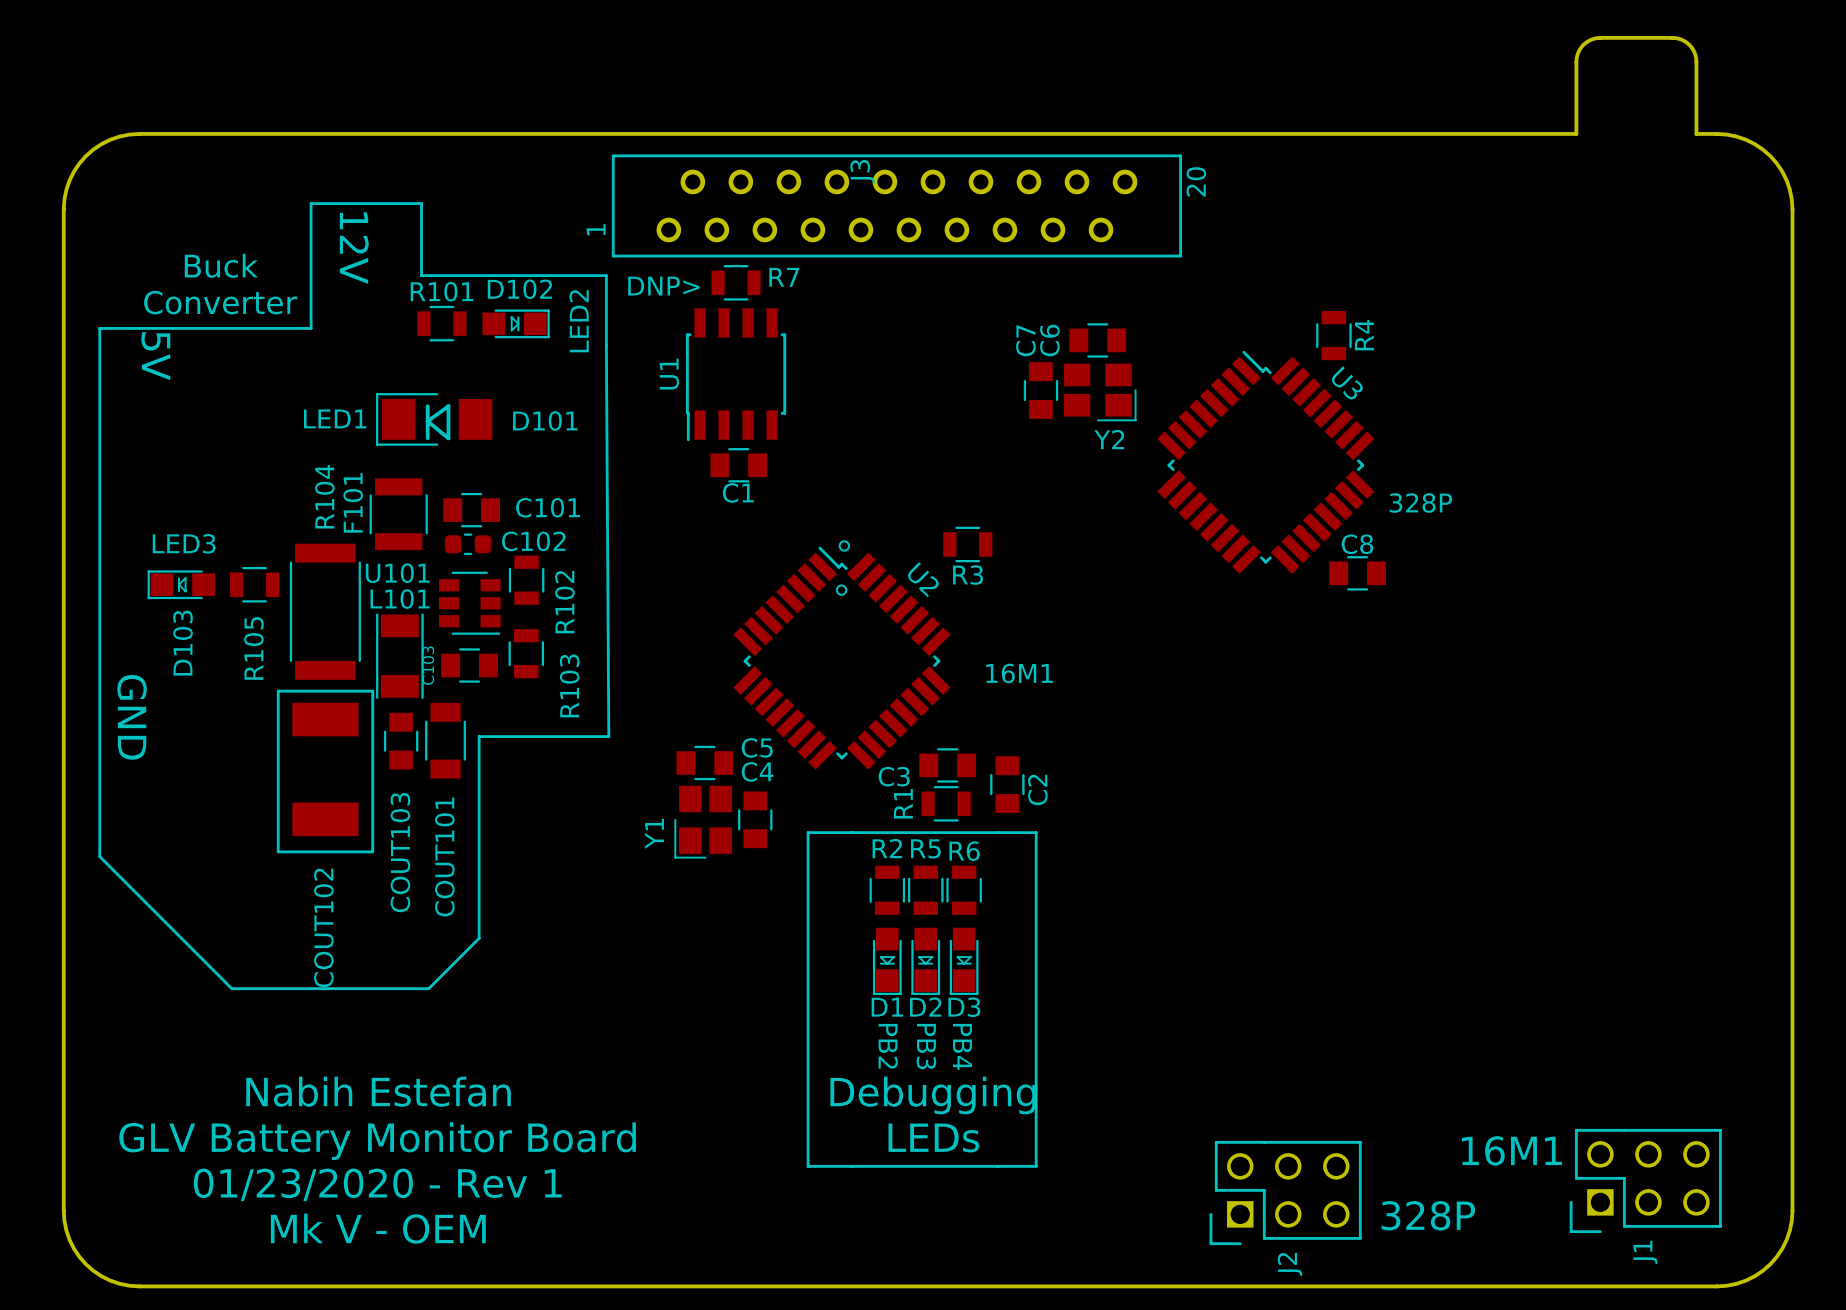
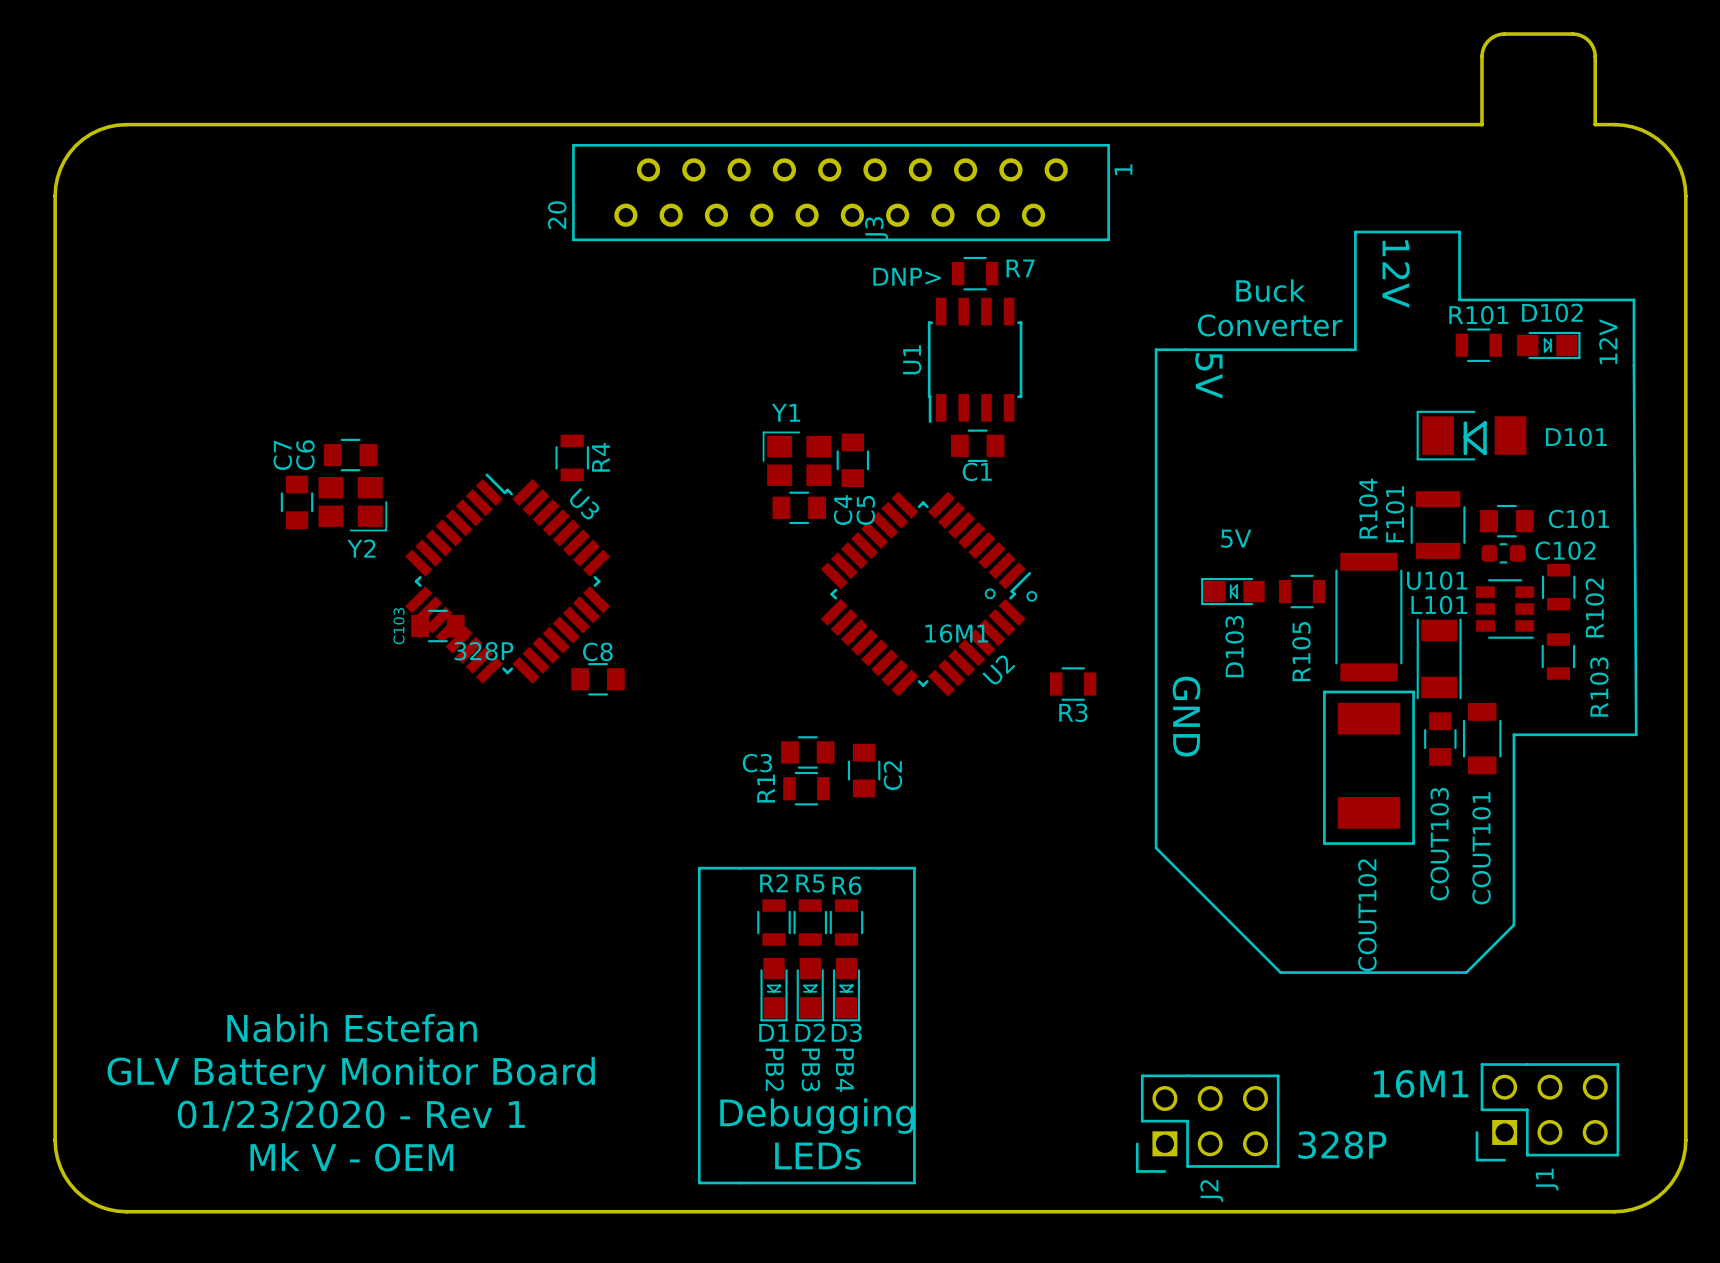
line: (311, 203) (421, 203) (421, 275) (606, 275) (608, 736) (479, 736) (479, 938) (428, 988) (231, 988) (99, 856) (99, 328) (311, 328) (311, 203) -> none
J3 rotation: 0° (896, 205) -> 180° (841, 192)
line: none -> (1355, 231) (1459, 231) (1459, 299) (1633, 299) (1636, 734) (1513, 734) (1513, 925) (1466, 972) (1280, 972) (1156, 848) (1156, 349) (1355, 349) (1355, 231)
text: 12V (354, 248) -> none
text: Buck (221, 265) -> none
R7 position: (736, 282) -> (975, 273)
text position: DNP> (663, 286) -> DNP> (907, 276)
text: none -> 12V (1396, 274)
text: Converter (220, 302) -> none
text: none -> Buck (1270, 290)
text: LED2 (579, 321) -> none
R101 position: (441, 323) -> (1478, 345)
D102 position: (516, 323) -> (1548, 345)
R4 position: (1333, 335) -> (572, 457)
C6 position: (1097, 340) -> (350, 455)
text: none -> Converter (1270, 325)
text: 5V (155, 356) -> none
text: none -> 12V (1608, 341)
U1 position: (736, 374) -> (975, 360)
C7 position: (1040, 390) -> (297, 502)
Y2 position: (1100, 392) -> (352, 504)
text: none -> 5V (1208, 375)
text: LED1 (335, 418) -> none
D101 position: (434, 419) -> (1471, 435)
U3 position: (1265, 462) -> (507, 578)
C1 position: (738, 465) -> (977, 445)
text: 328P (1420, 502) -> none
C101 position: (471, 510) -> (1506, 521)
F101 position: (398, 514) -> (1438, 525)
text: LED3 (184, 543) -> none
C102 position: (468, 544) -> (1503, 553)
R3 position: (967, 544) -> (1073, 684)
text: none -> 5V (1236, 538)
C8 position: (1357, 573) -> (598, 679)
R102 position: (526, 580) -> (1558, 587)
D103 position: (181, 584) -> (1232, 591)
R105 position: (254, 584) -> (1302, 591)
U101 position: (469, 603) -> (1505, 608)
R104 position: (325, 611) -> (1368, 617)
R103 position: (526, 653) -> (1558, 656)
U2 rotation: 0° (841, 655) -> 90° clockwise (928, 594)
U2 position: (841, 655) -> (928, 594)
L101 position: (399, 656) -> (1439, 658)
text: none -> 328P (483, 651)
text: GND (132, 717) -> none
COUT101 position: (445, 740) -> (1482, 738)
COUT103 position: (401, 741) -> (1440, 739)
text: none -> GND (1186, 716)
C5 rotation: 0° (704, 762) -> 90° clockwise (852, 460)
C5 position: (704, 762) -> (852, 460)
C3 position: (947, 765) -> (807, 752)
COUT102 position: (325, 771) -> (1368, 767)
C2 position: (1007, 784) -> (864, 770)
R1 position: (946, 803) -> (806, 788)
C4 rotation: 0° (755, 819) -> 90° clockwise (799, 507)
C4 position: (755, 819) -> (799, 507)
Y1 rotation: 0° (703, 822) -> 90° clockwise (797, 458)
Y1 position: (703, 822) -> (797, 458)
line: (808, 832) (1036, 832) (1036, 1166) (808, 1166) (808, 832) -> (699, 868) (914, 868) (914, 1182) (699, 1182) (699, 868)
R2 position: (887, 890) -> (774, 922)
R5 position: (925, 890) -> (810, 922)
R6 position: (964, 890) -> (846, 922)
D1 position: (887, 961) -> (774, 989)
D2 position: (925, 961) -> (810, 989)
D3 position: (964, 961) -> (846, 989)
text position: PB2 (888, 1046) -> PB2 (774, 1069)
text position: PB3 (926, 1046) -> PB3 (810, 1069)
text position: PB4 (962, 1046) -> PB4 (844, 1070)
text position: Debugging (933, 1095) -> Debugging (817, 1116)
text position: LEDs (933, 1137) -> LEDs (817, 1156)

